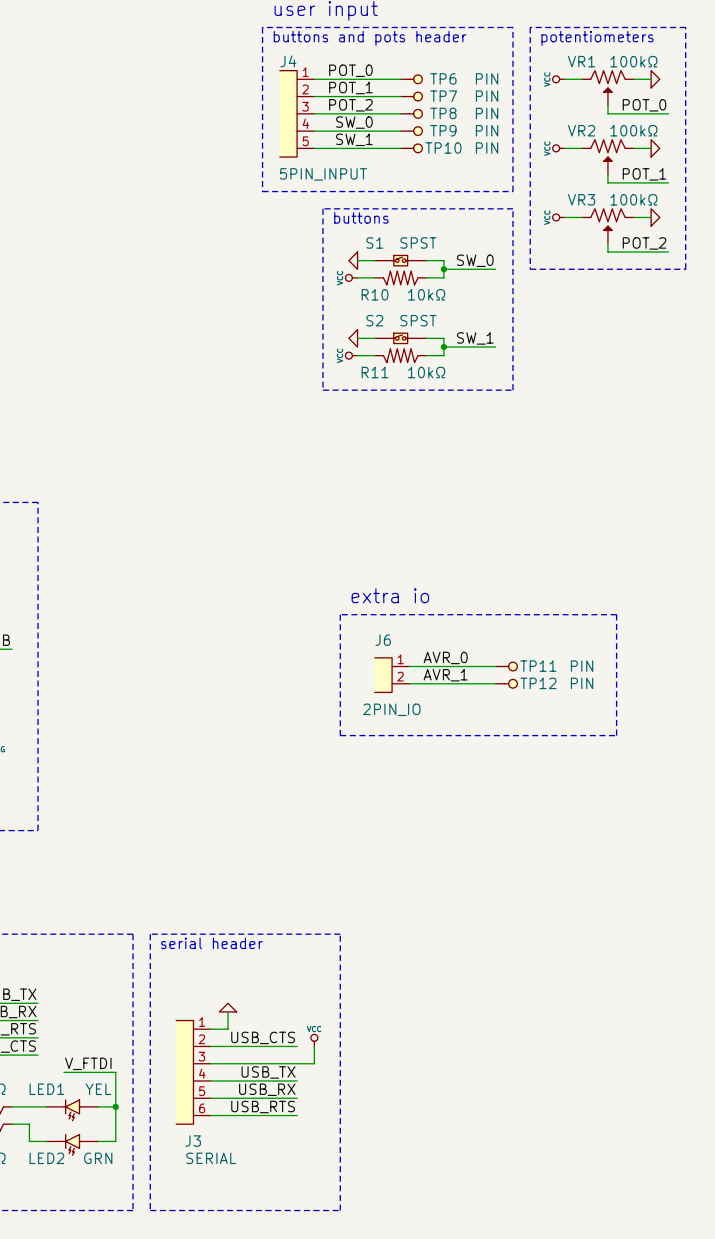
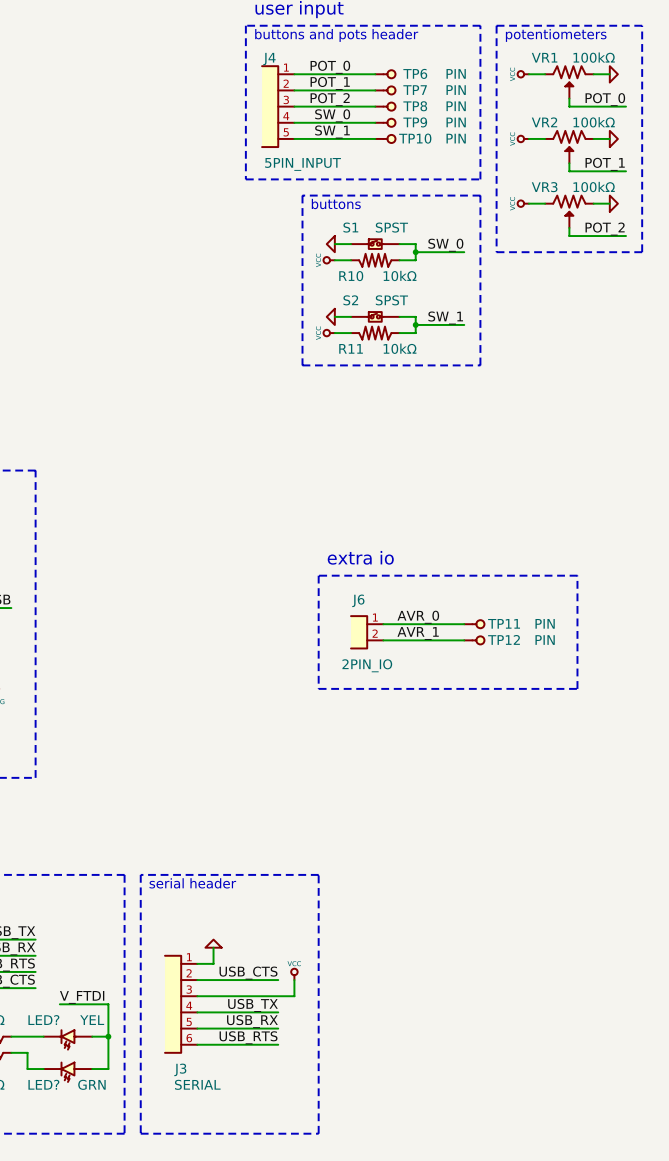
LED1 name: LED1 (46, 1089) -> LED? (43, 1020)
LED2 name: LED2 (46, 1158) -> LED? (43, 1084)

